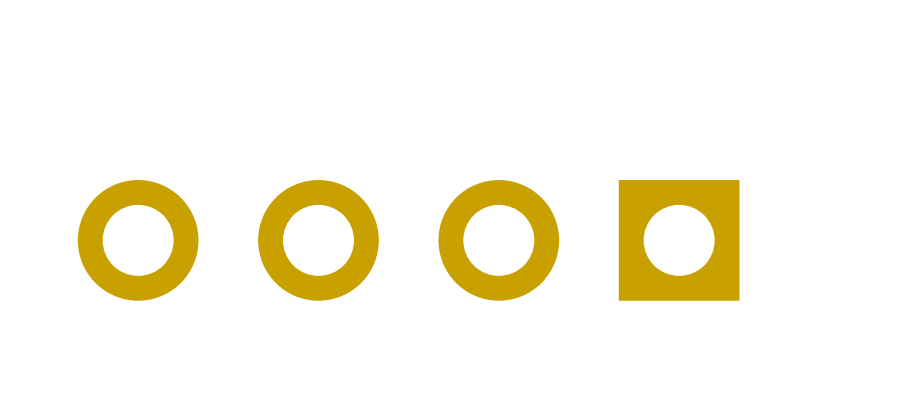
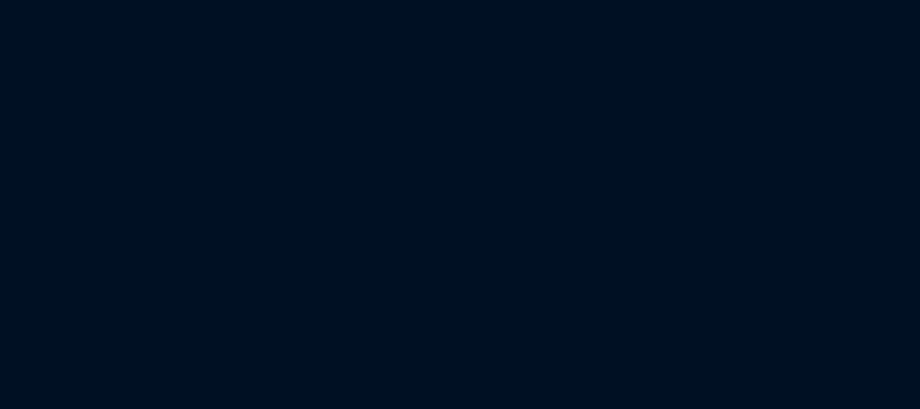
part: (408, 240) -> none

